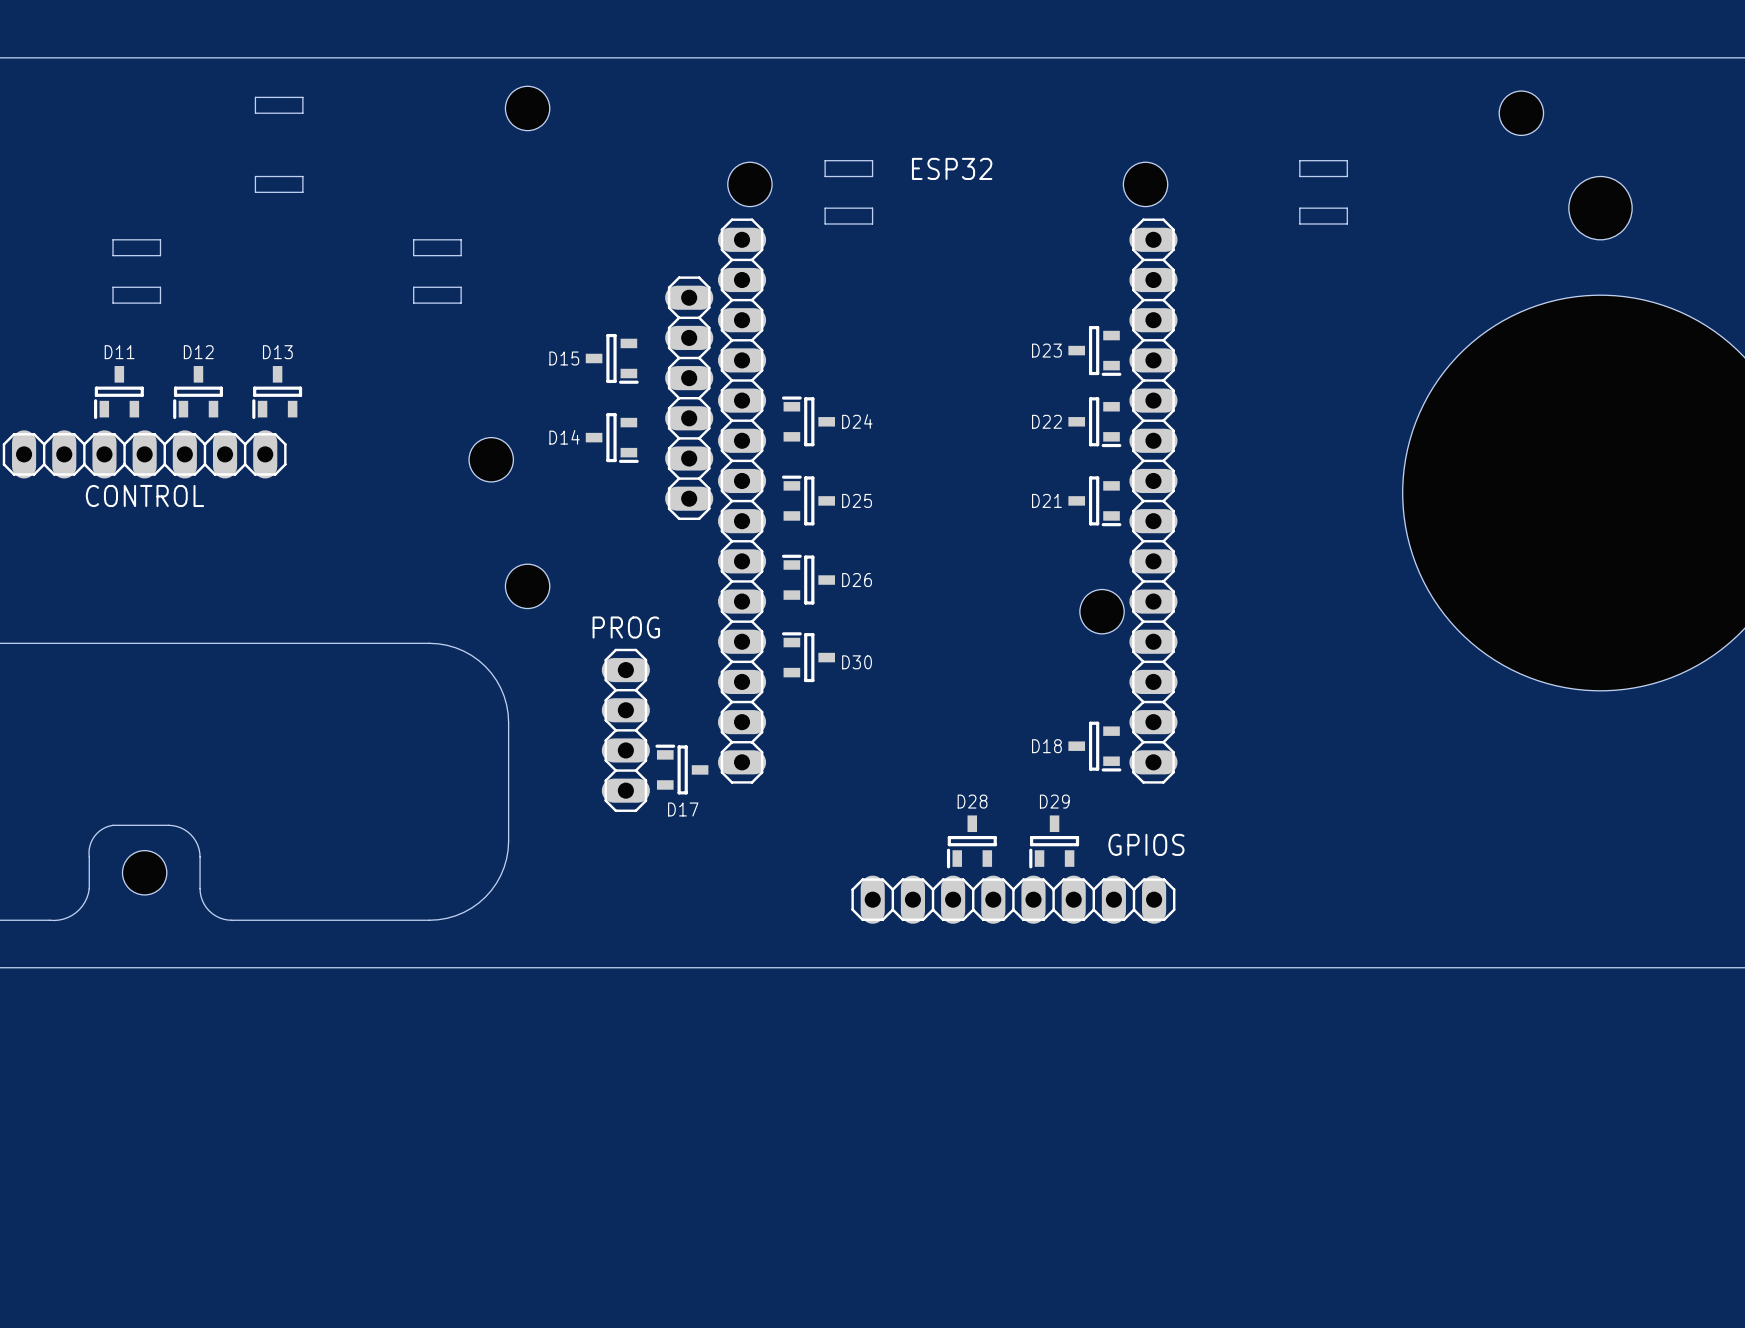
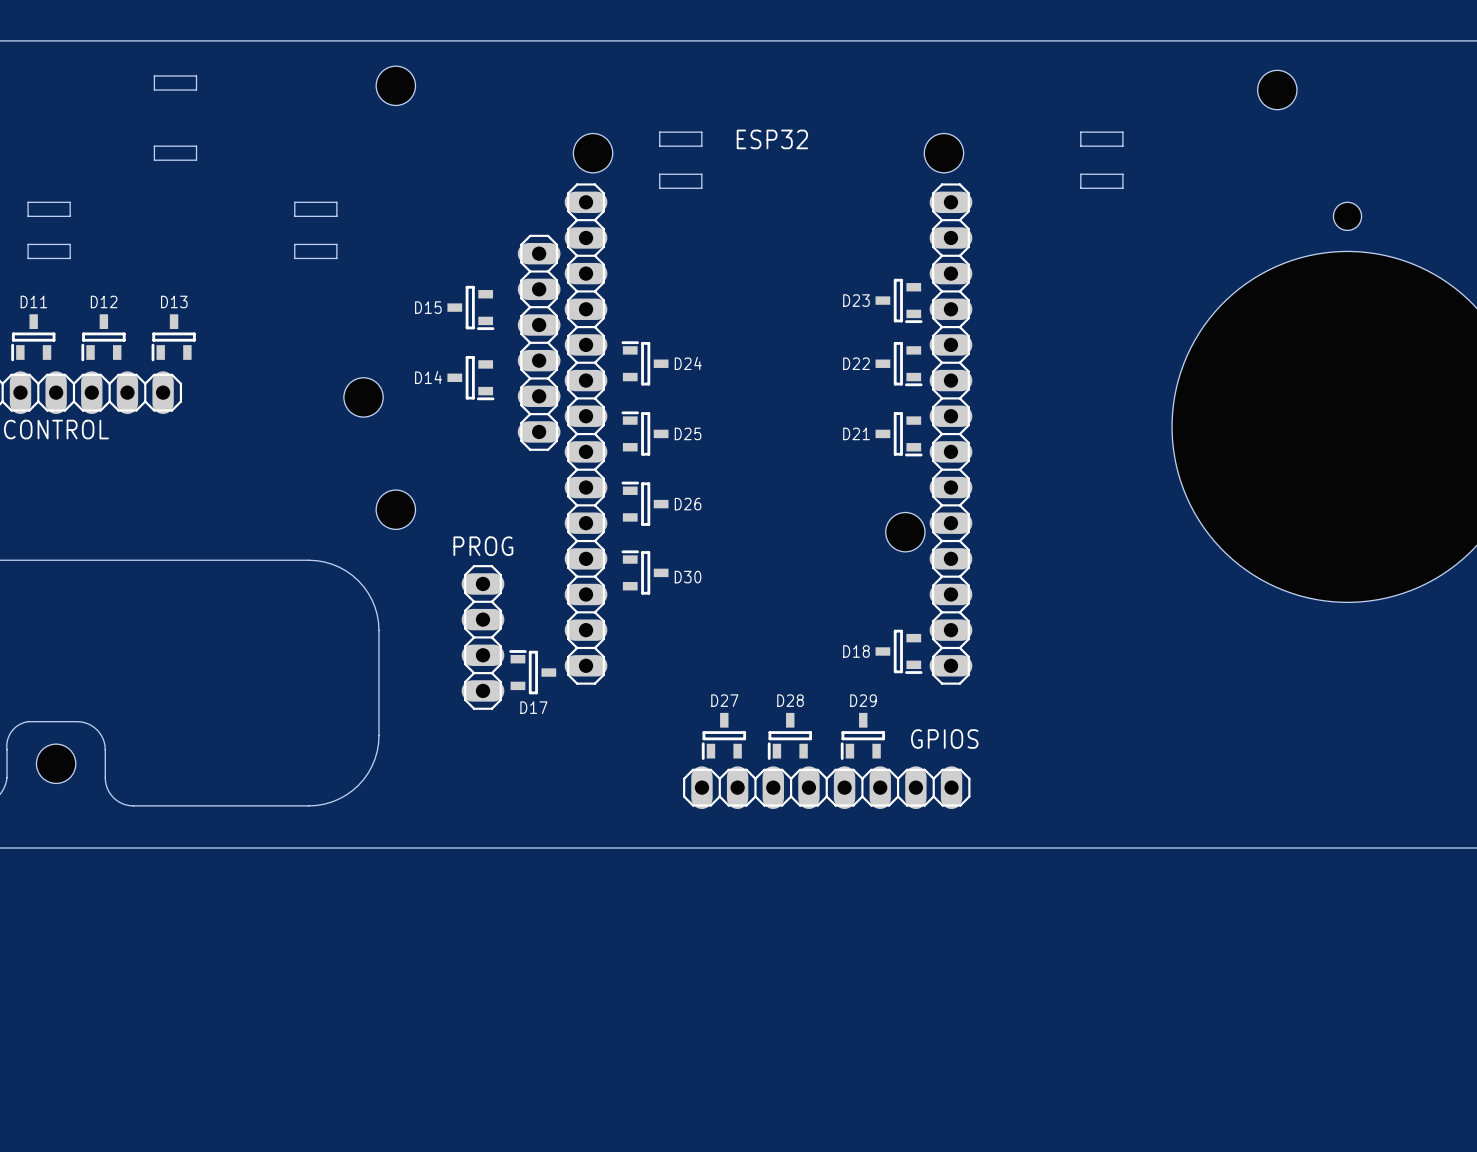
hole: (1600, 208) -> none
hole: none -> (1347, 216)
D27: none -> (723, 736)

